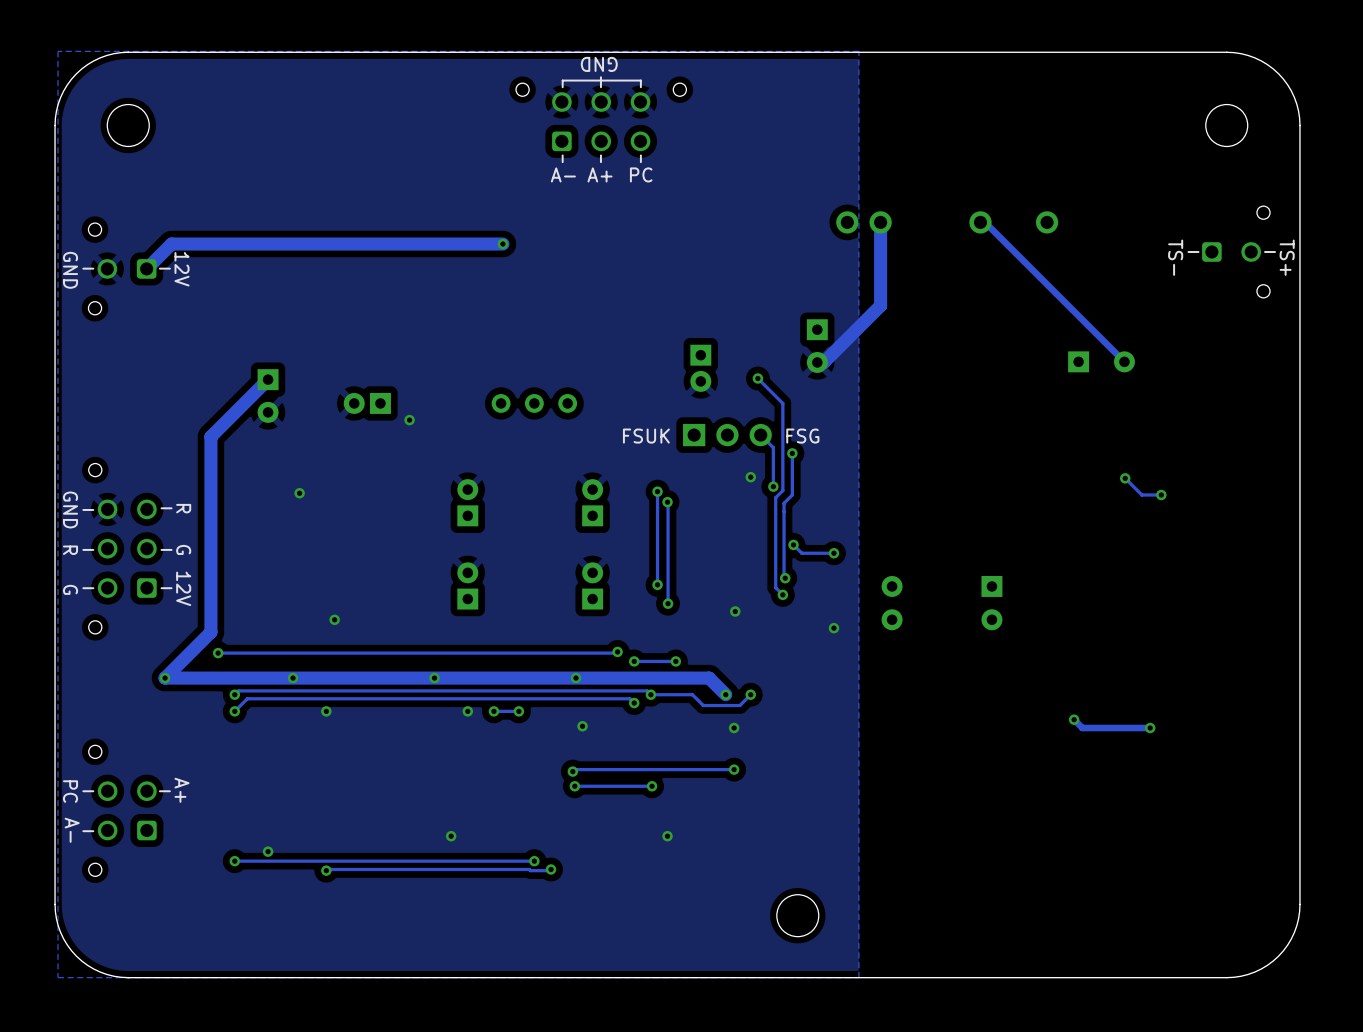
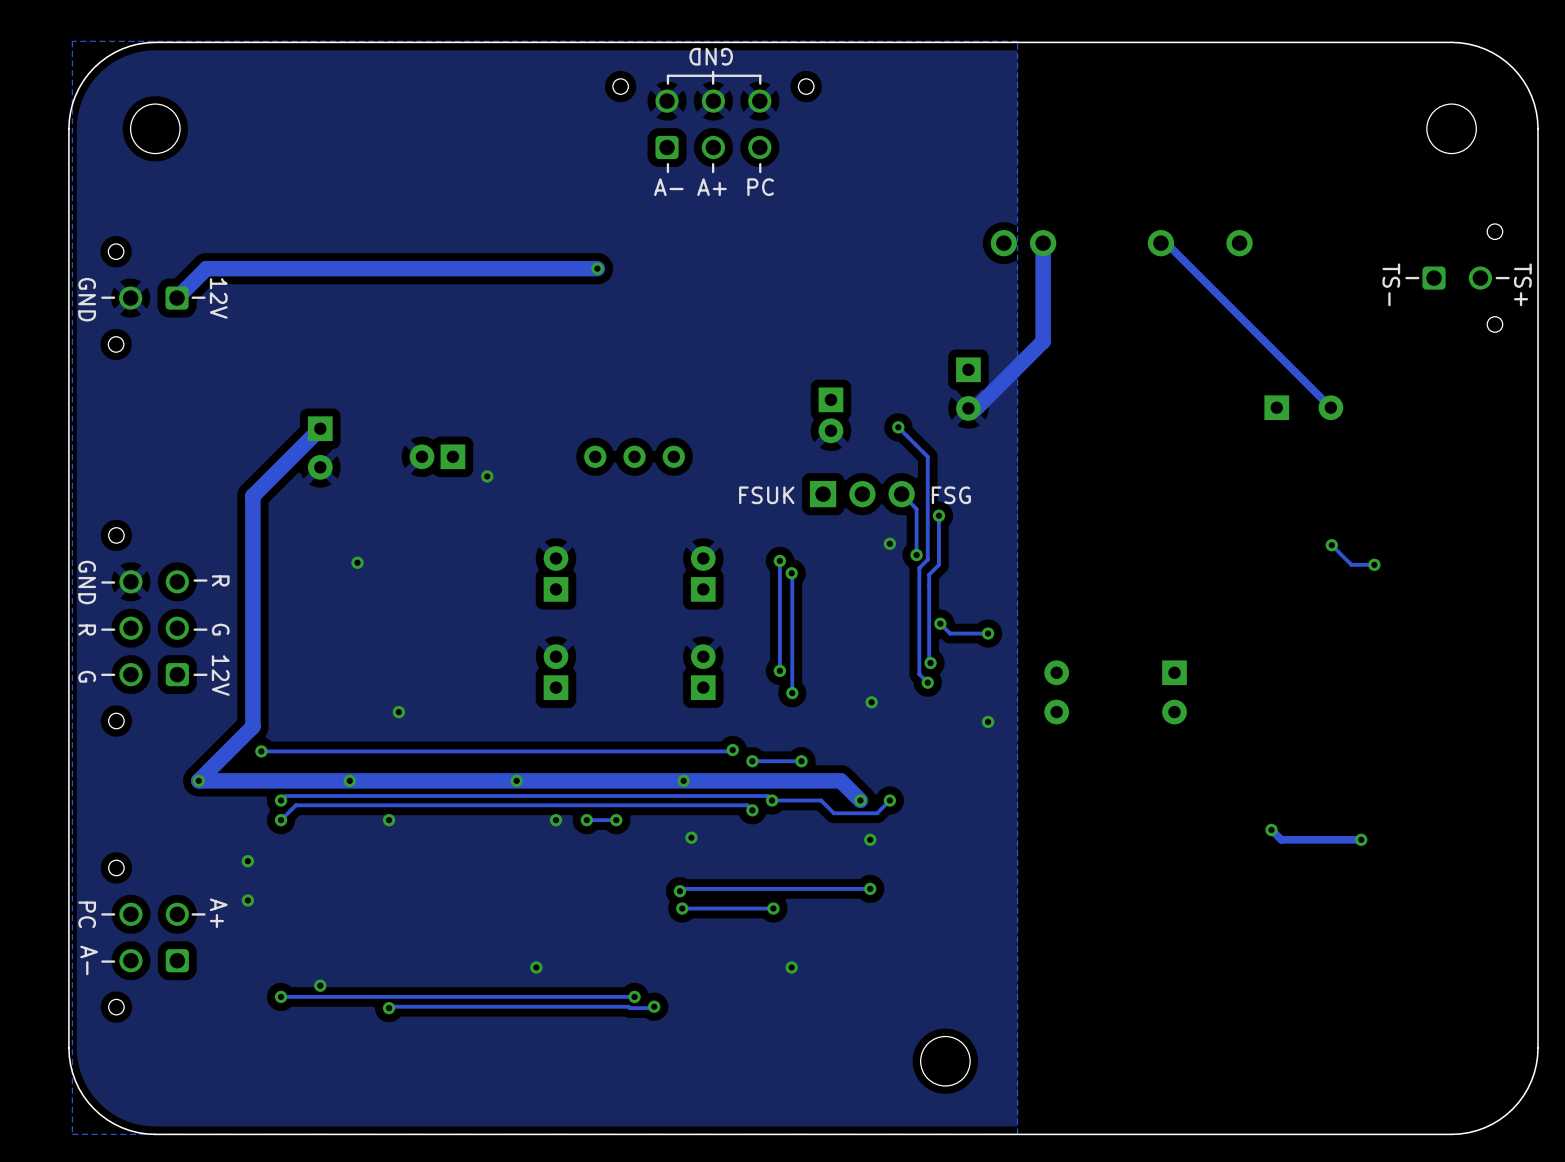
via: none -> (247, 861)
via: none -> (247, 900)

